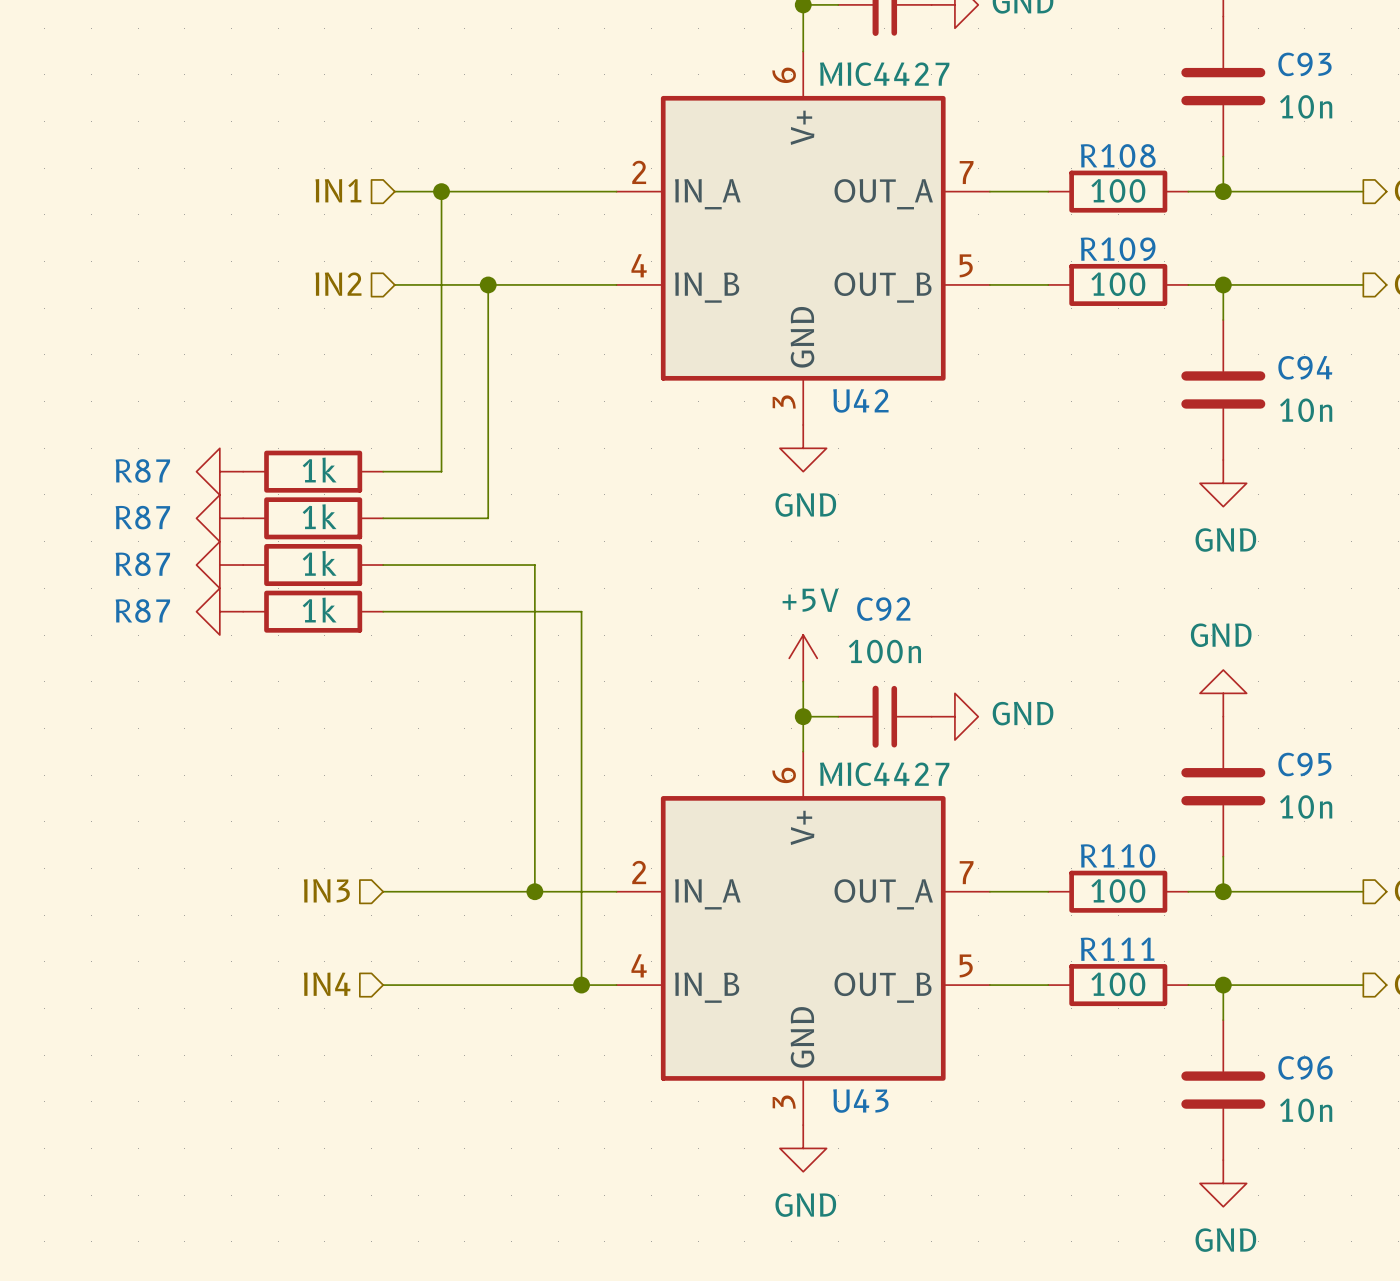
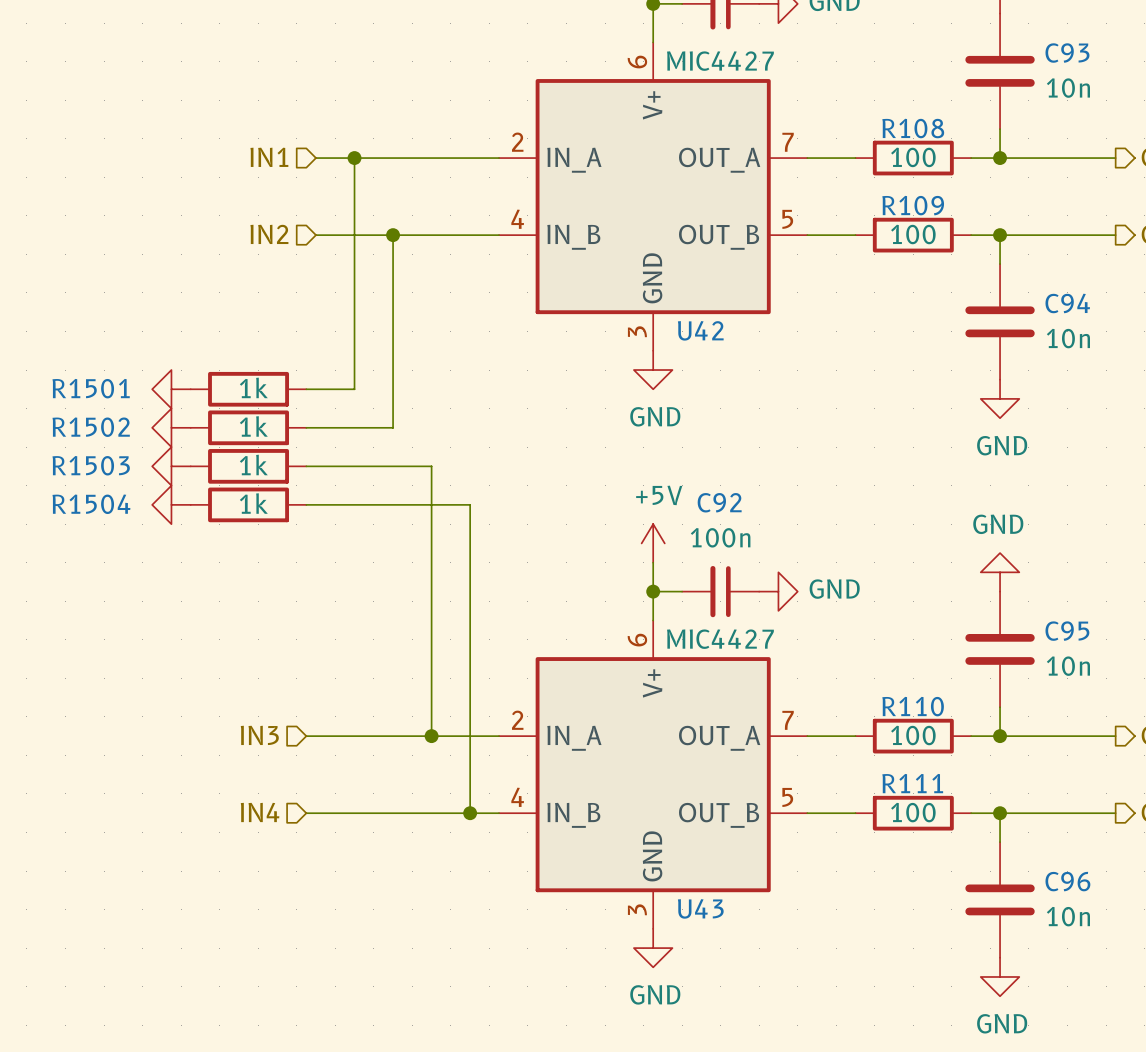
R87 name: R87 (142, 470) -> R1501 (91, 388)
R87 name: R87 (142, 517) -> R1502 (91, 427)
R87 name: R87 (142, 564) -> R1503 (91, 465)
R87 name: R87 (142, 610) -> R1504 (91, 504)

